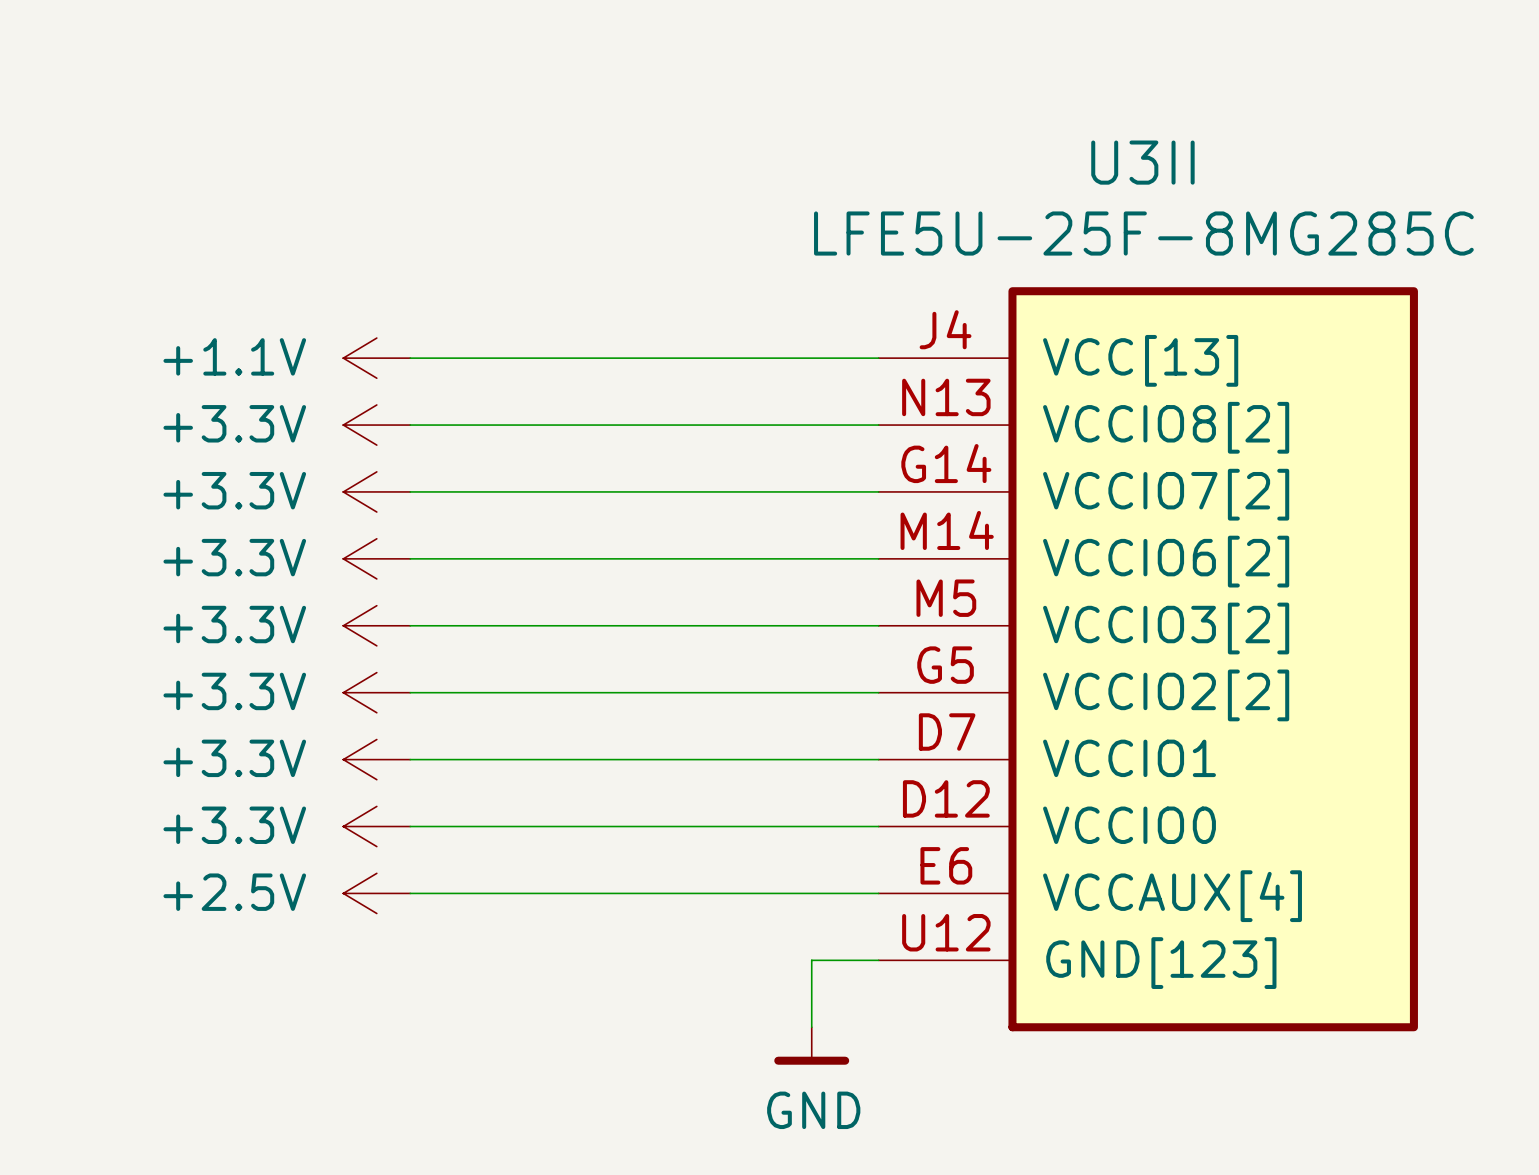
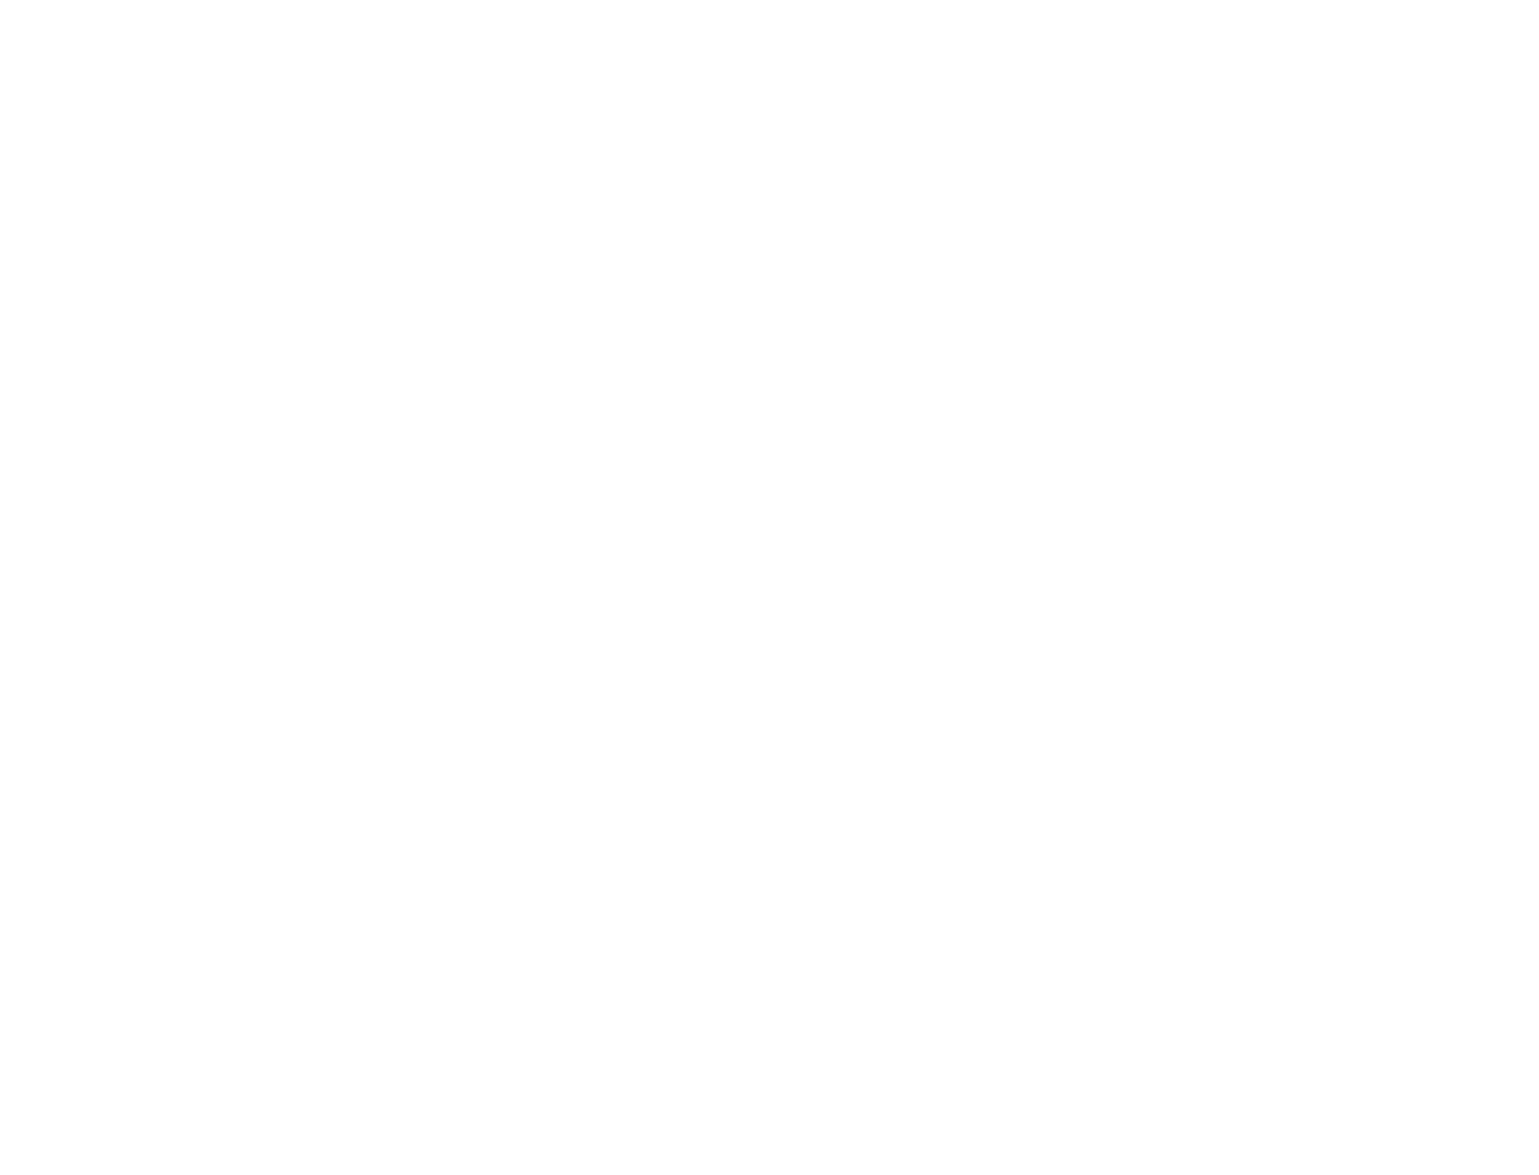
power symbol: +1.1V (376, 358) -> none
wire: (410, 358) (878, 358) -> none
power symbol: +3.3V (376, 425) -> none
wire: (410, 425) (878, 425) -> none
power symbol: +3.3V (376, 491) -> none
wire: (410, 491) (878, 491) -> none
power symbol: +3.3V (376, 558) -> none
wire: (410, 558) (878, 558) -> none
power symbol: +3.3V (376, 625) -> none
wire: (410, 625) (878, 625) -> none
U3II: LFE5U-25F-8MG285C (1148, 659) -> none
power symbol: +3.3V (376, 692) -> none
wire: (410, 692) (878, 692) -> none
power symbol: +3.3V (376, 759) -> none
wire: (410, 759) (878, 759) -> none
power symbol: +3.3V (376, 826) -> none
wire: (410, 826) (878, 826) -> none
power symbol: +2.5V (376, 893) -> none
wire: (410, 893) (878, 893) -> none
wire: (878, 960) (811, 960) (811, 1027) -> none
power symbol: GND (811, 1045) -> none

